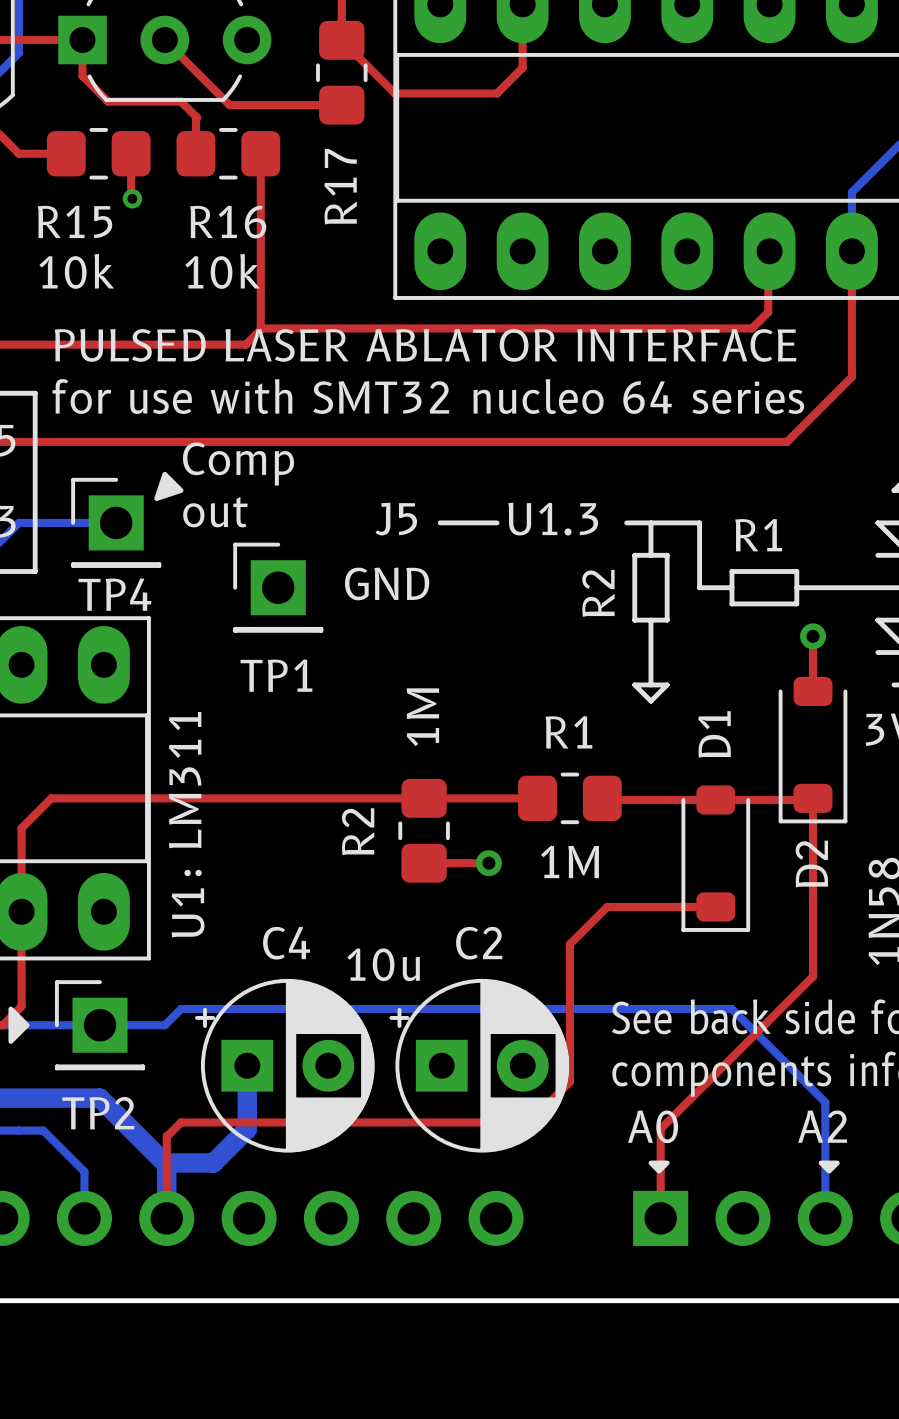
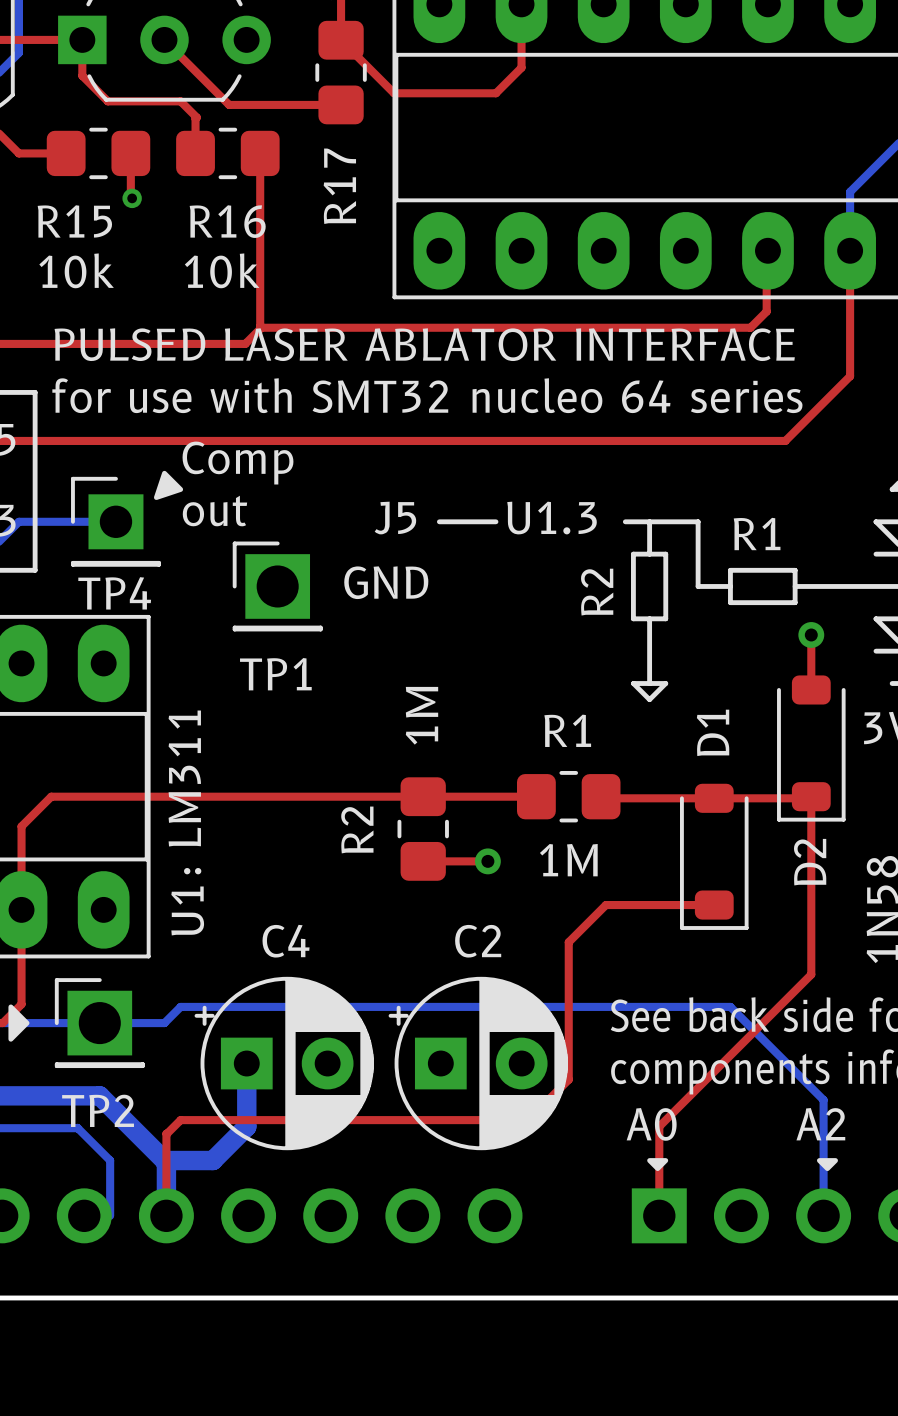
TP1 footprint: [233, 542, 324, 633] -> [232, 541, 323, 632]
text: 10u (383, 964) -> none
TP2 footprint: [54, 980, 146, 1071] -> [54, 978, 145, 1069]
bottom track: (43, 1130) (84, 1171) (84, 1218) -> (43, 1128) (77, 1128)
bottom track: none -> (77, 1127) (110, 1160) (110, 1215)

